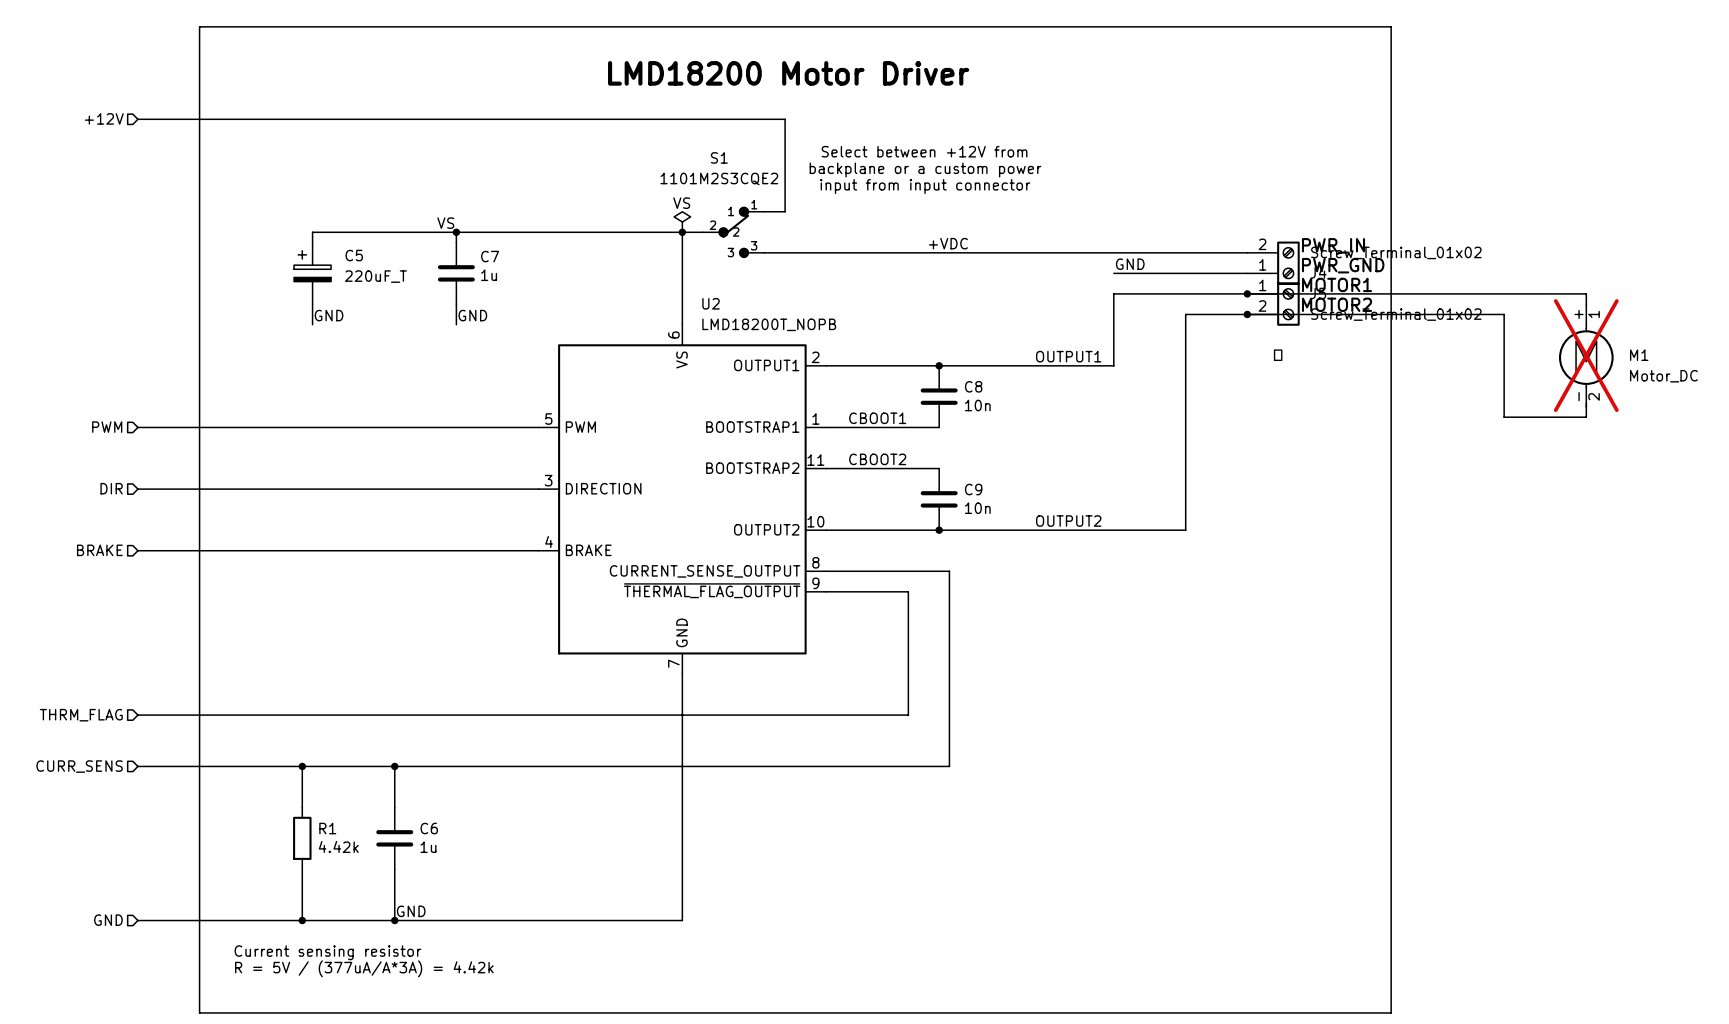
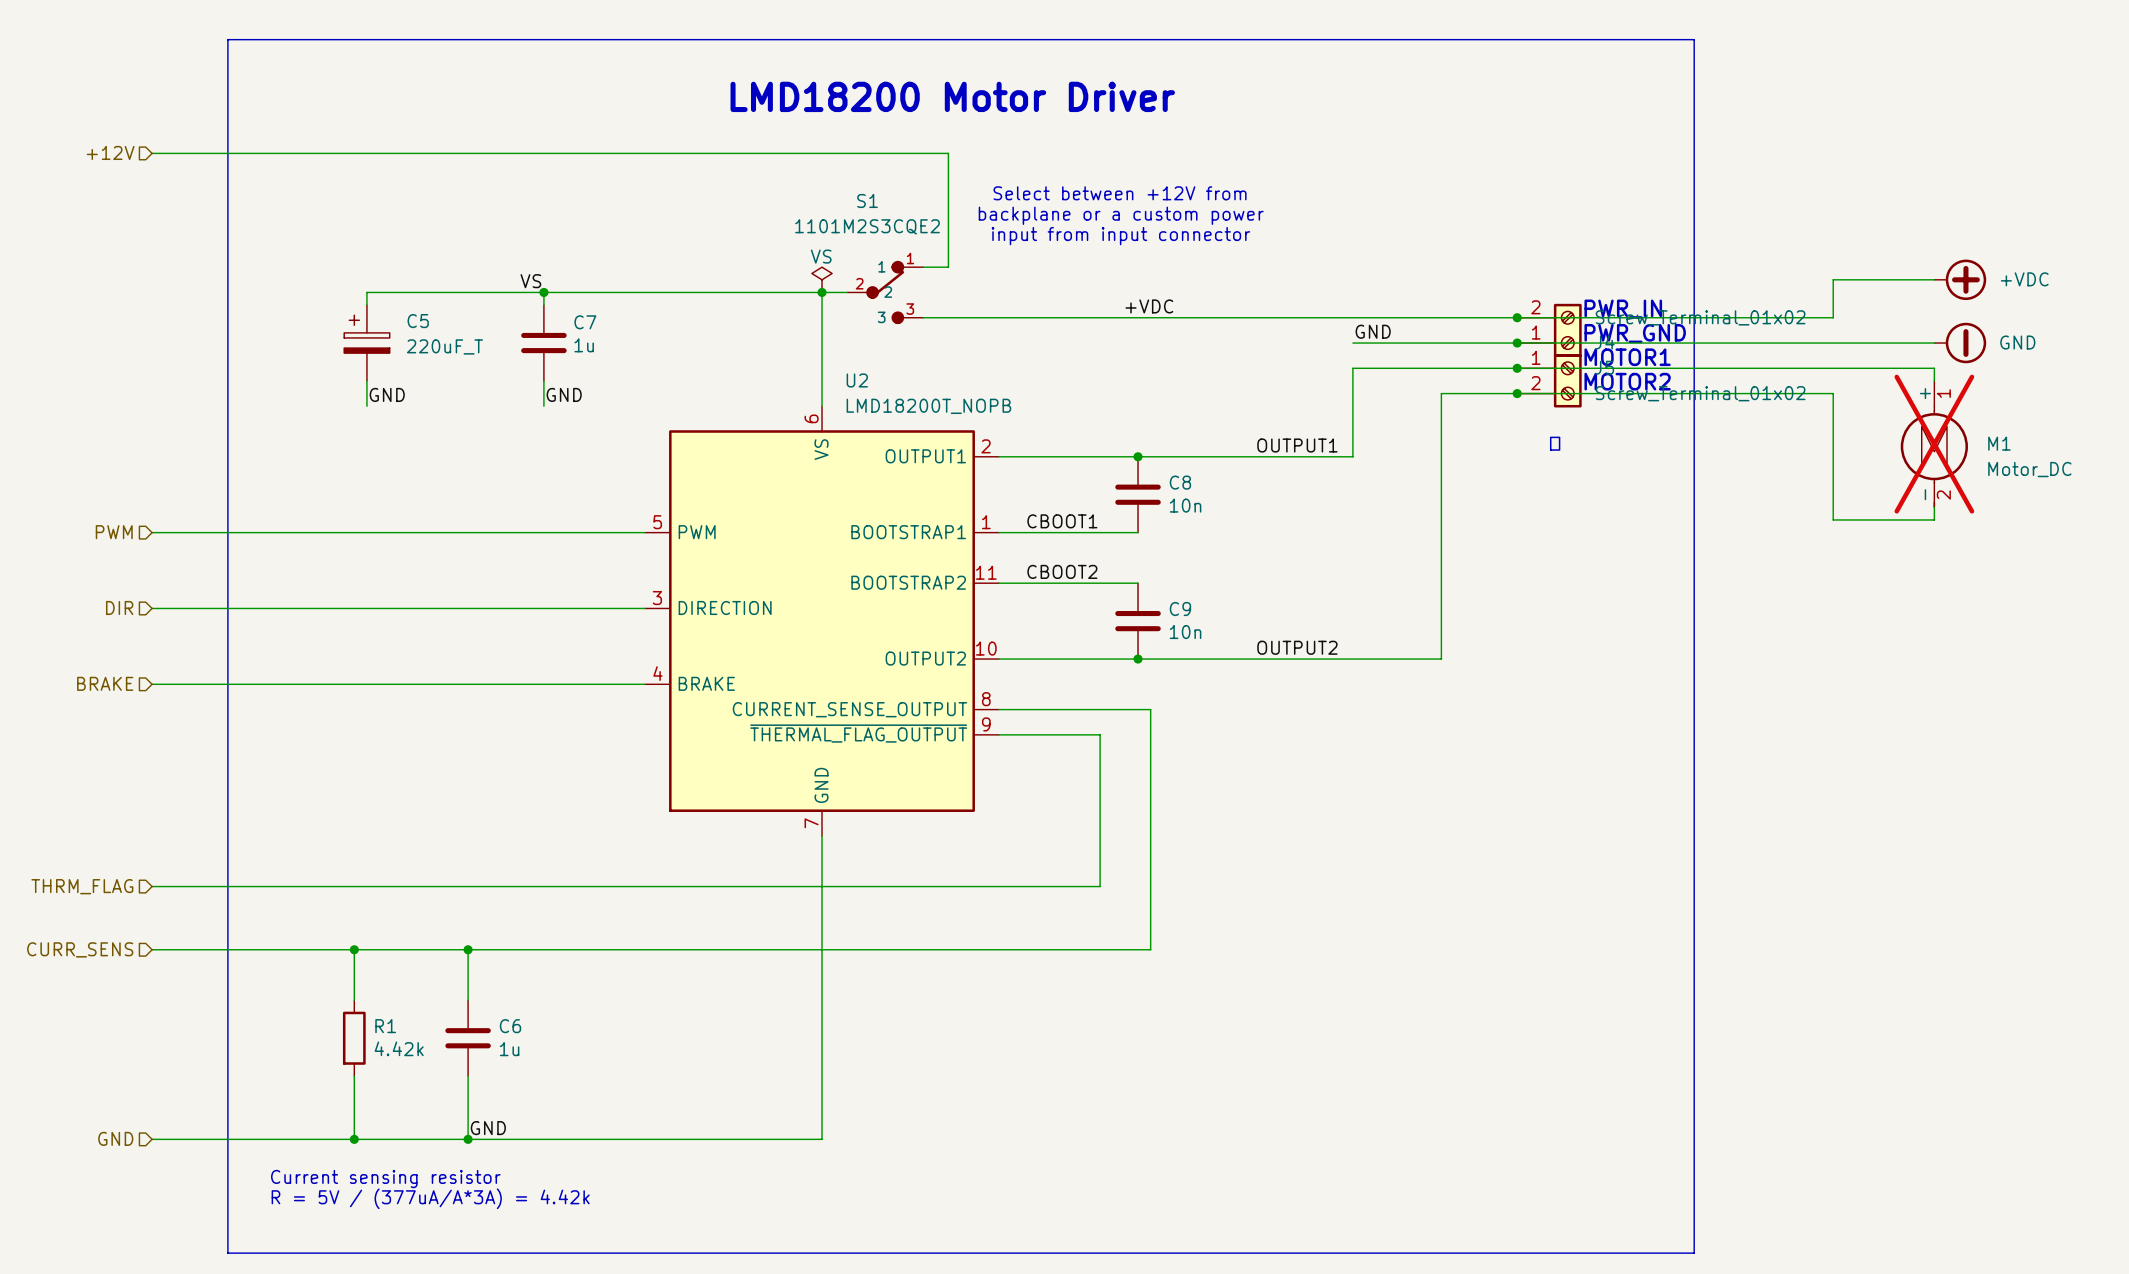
wire: none -> (1934, 279) (1833, 279) (1833, 317) (1517, 317)
power symbol: none -> +VDC (1960, 279)
junction: none -> (1517, 317)
wire: none -> (1517, 343) (1934, 343)
junction: none -> (1517, 343)
power symbol: none -> GND (1960, 343)

